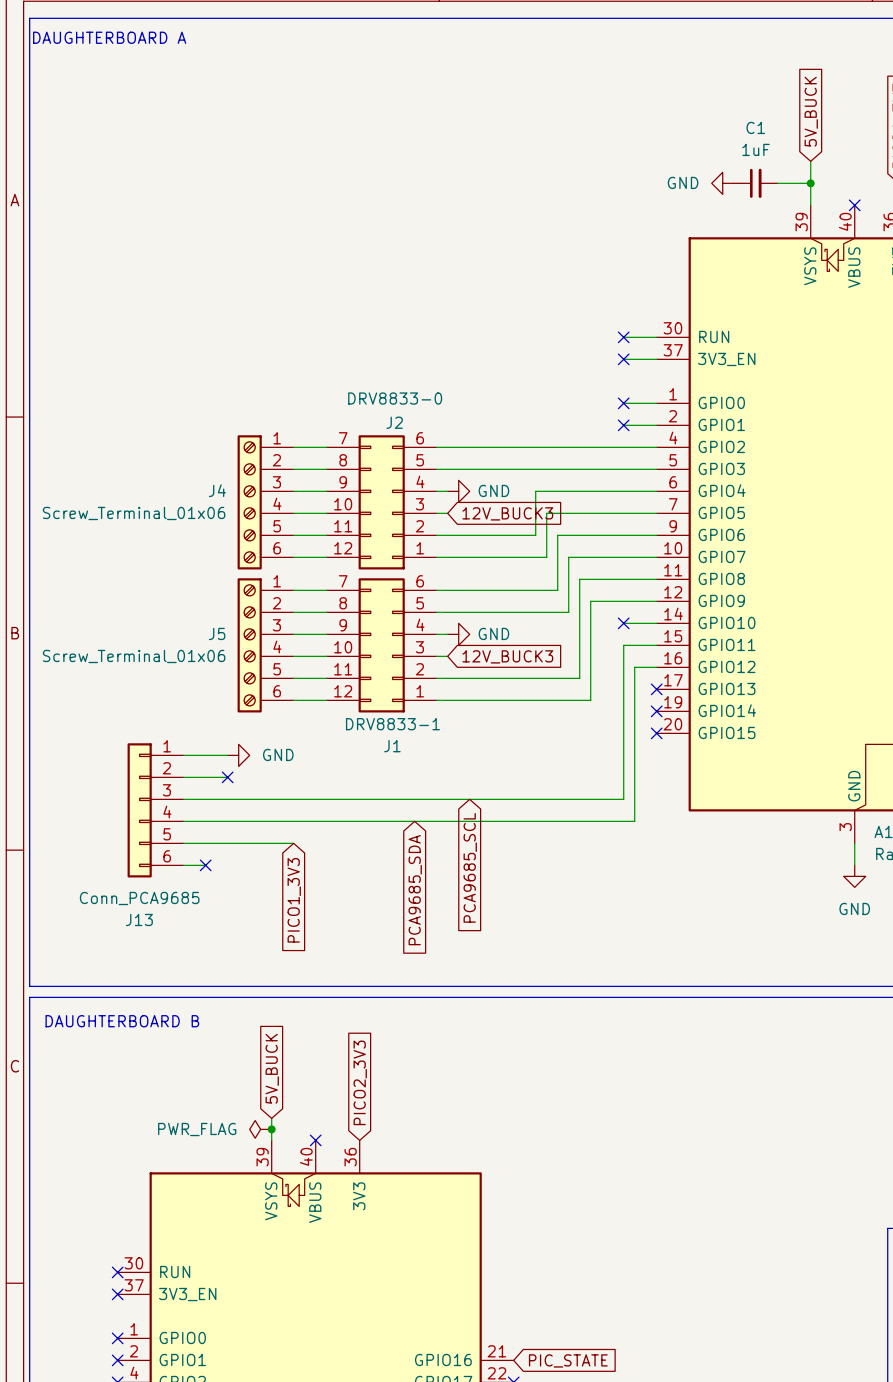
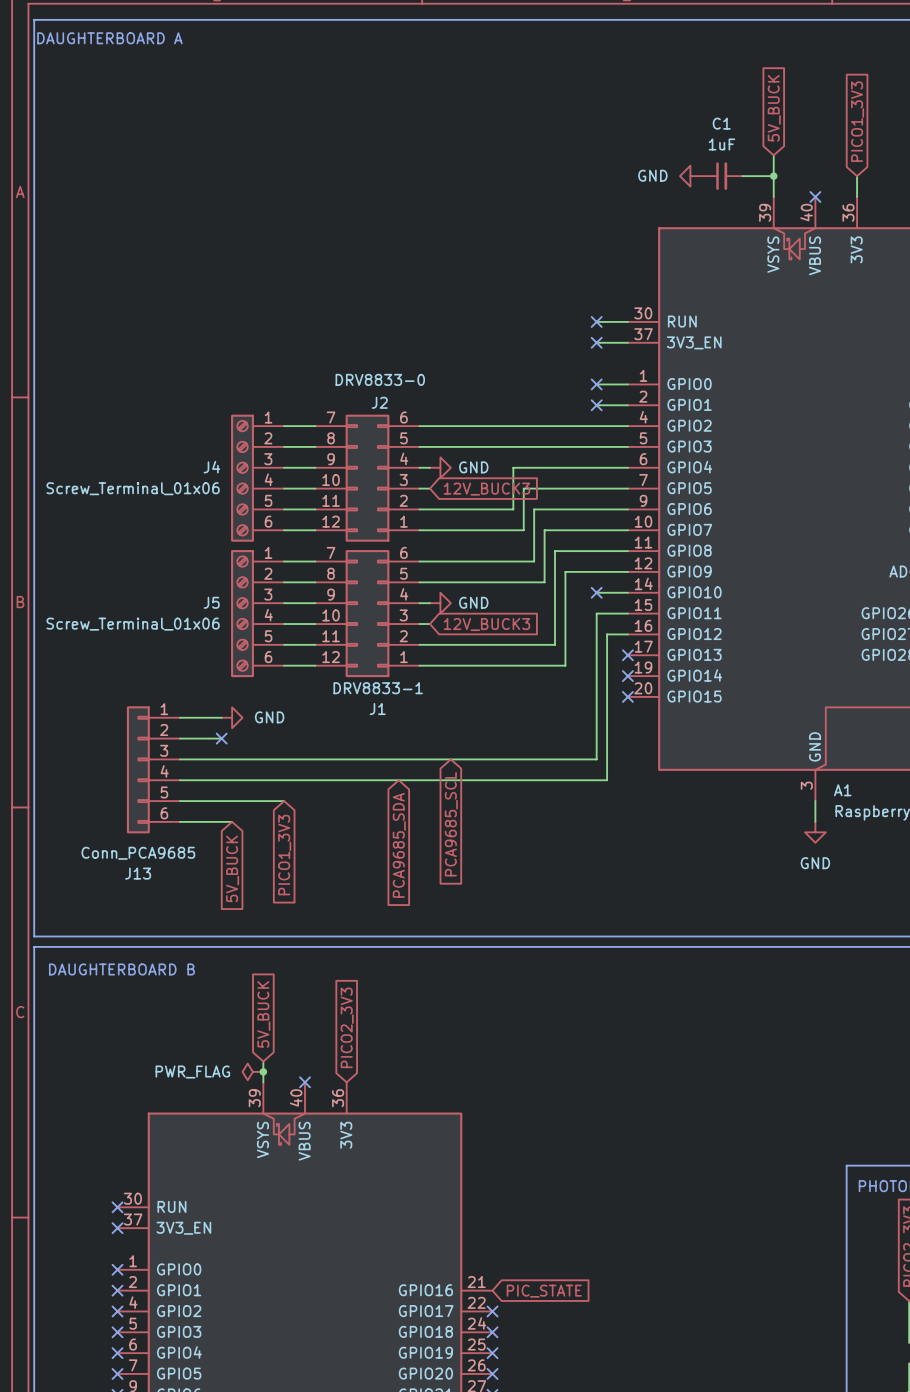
wire: none -> (200, 821) (232, 821)
no-connect mark: (205, 865) -> none
global label: none -> 5V_BUCK (232, 868)

